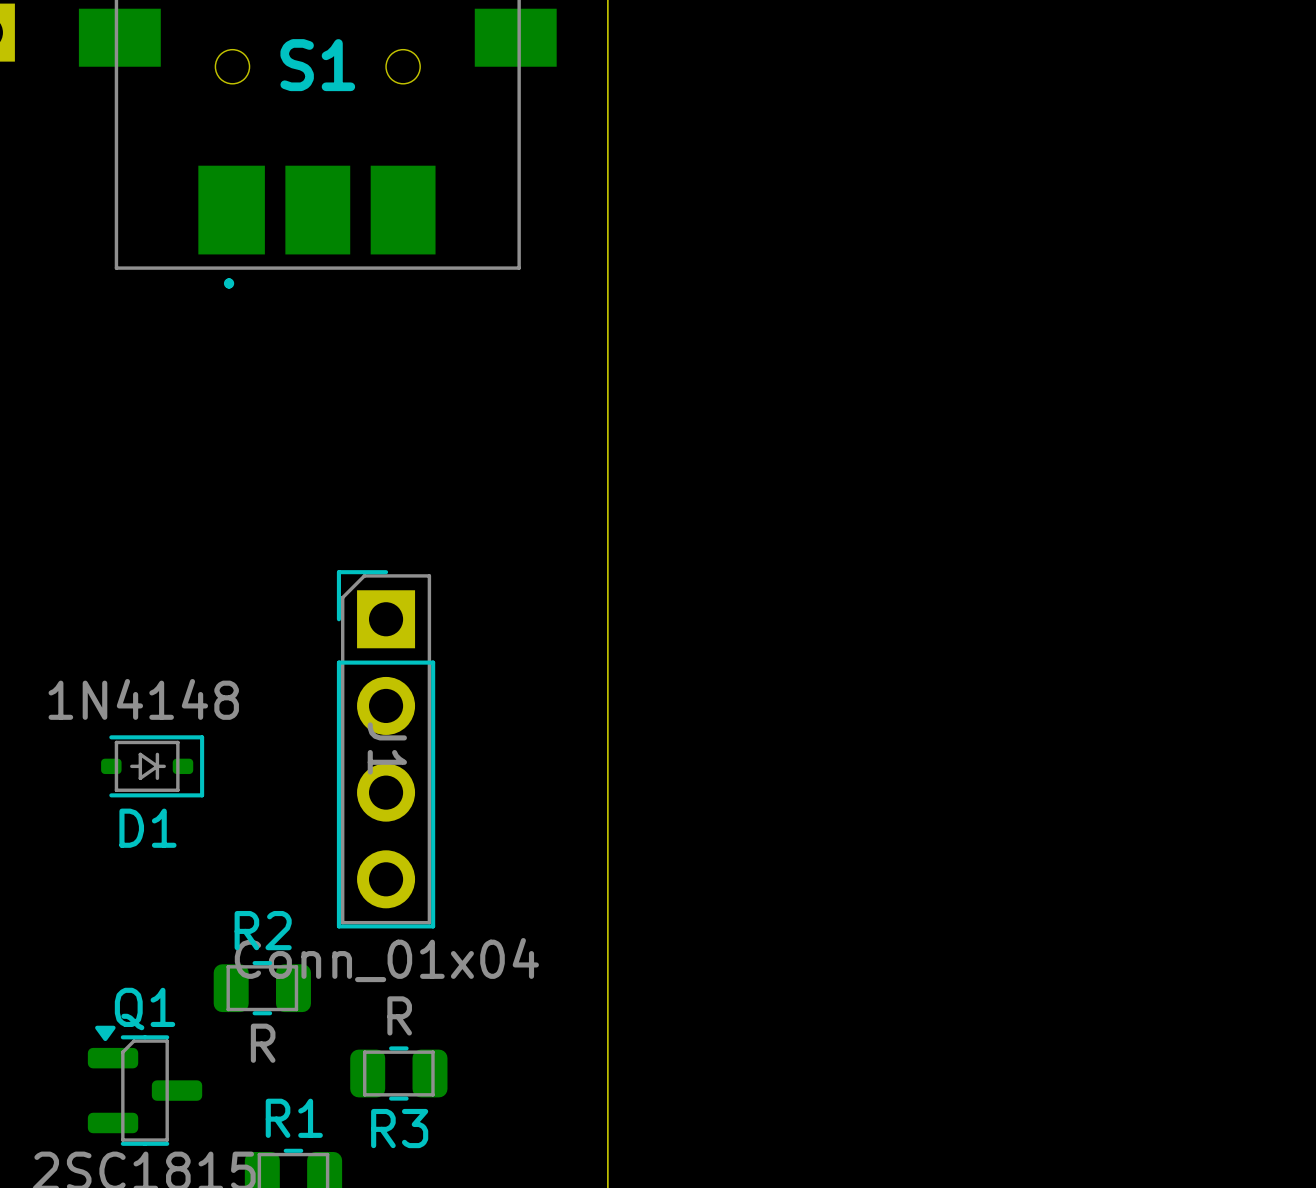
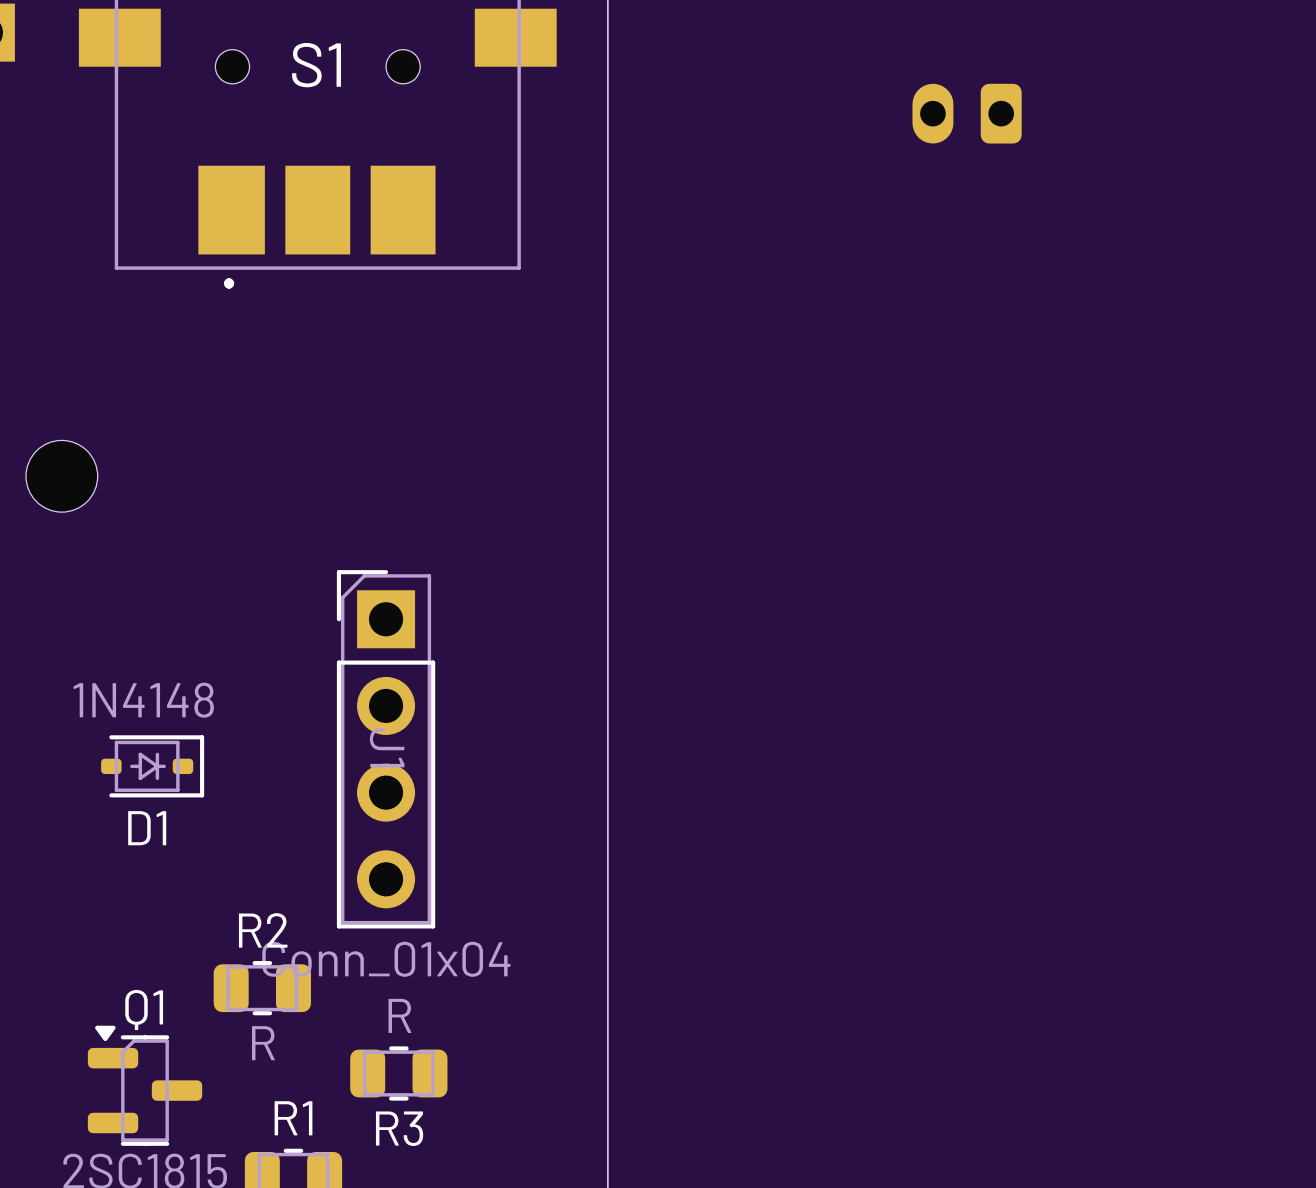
part: none -> (967, 113)
part: none -> (61, 476)

